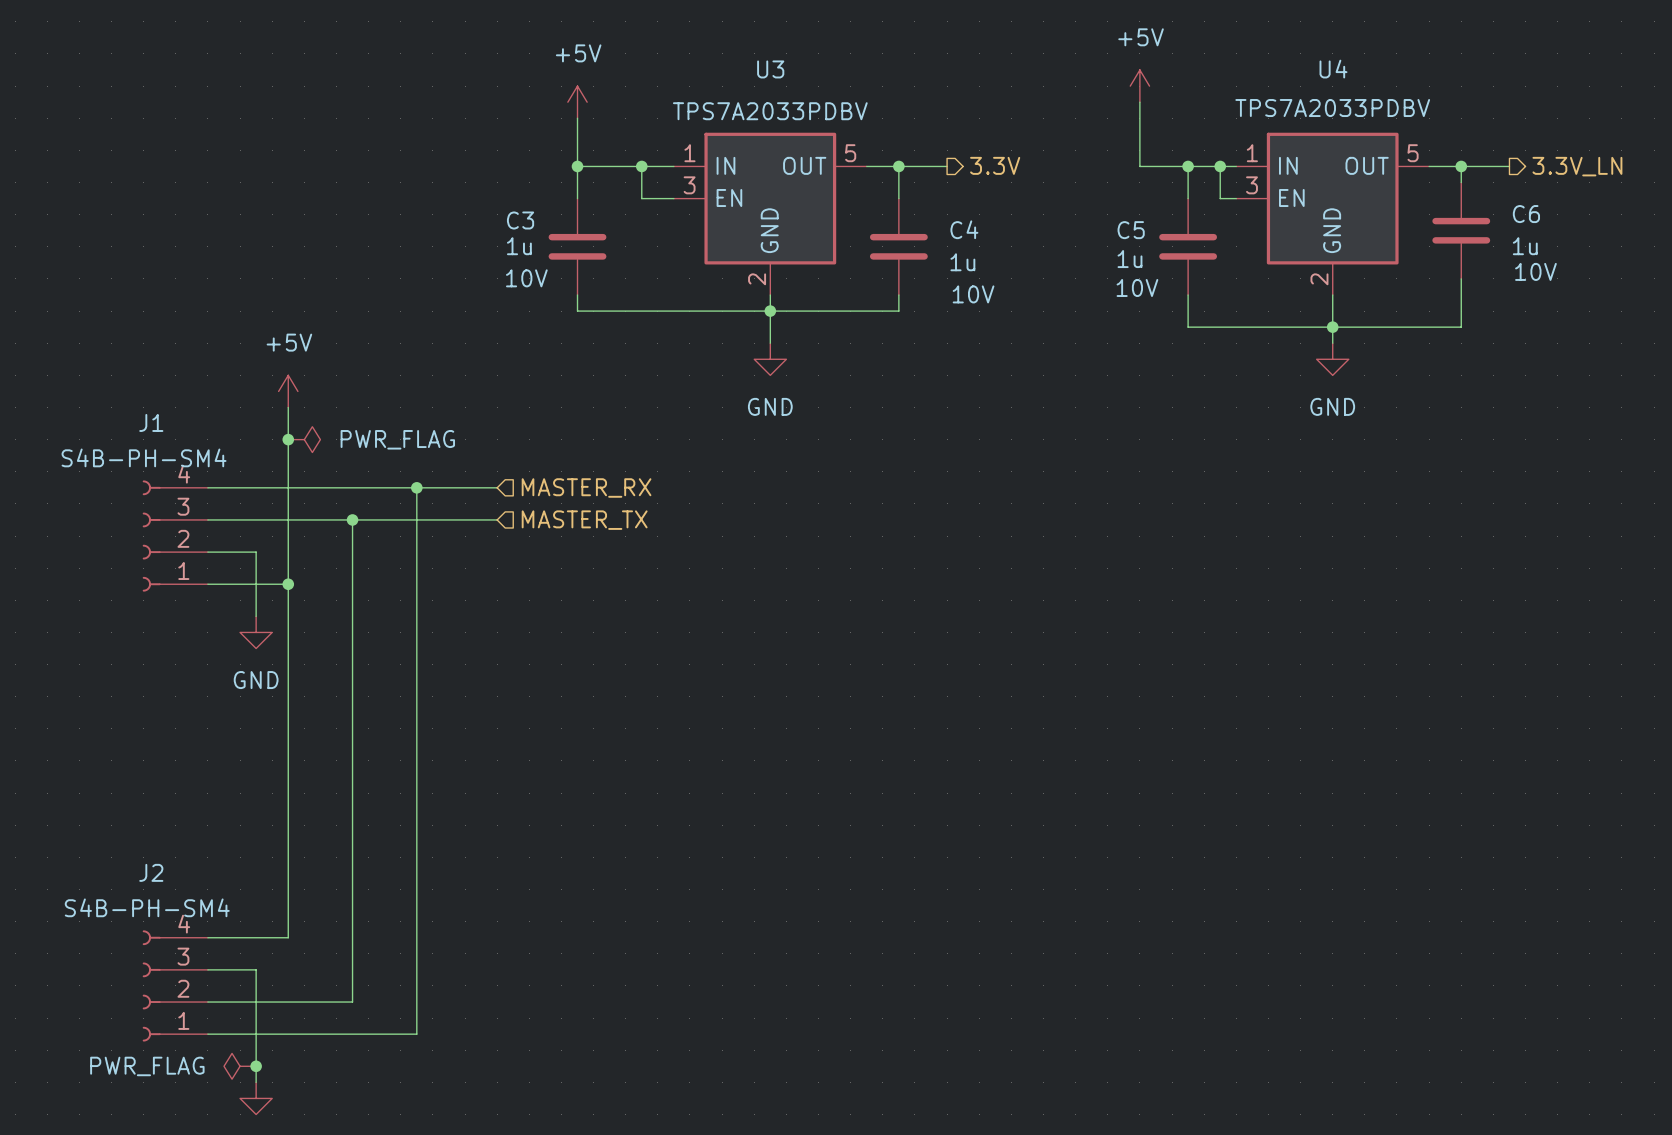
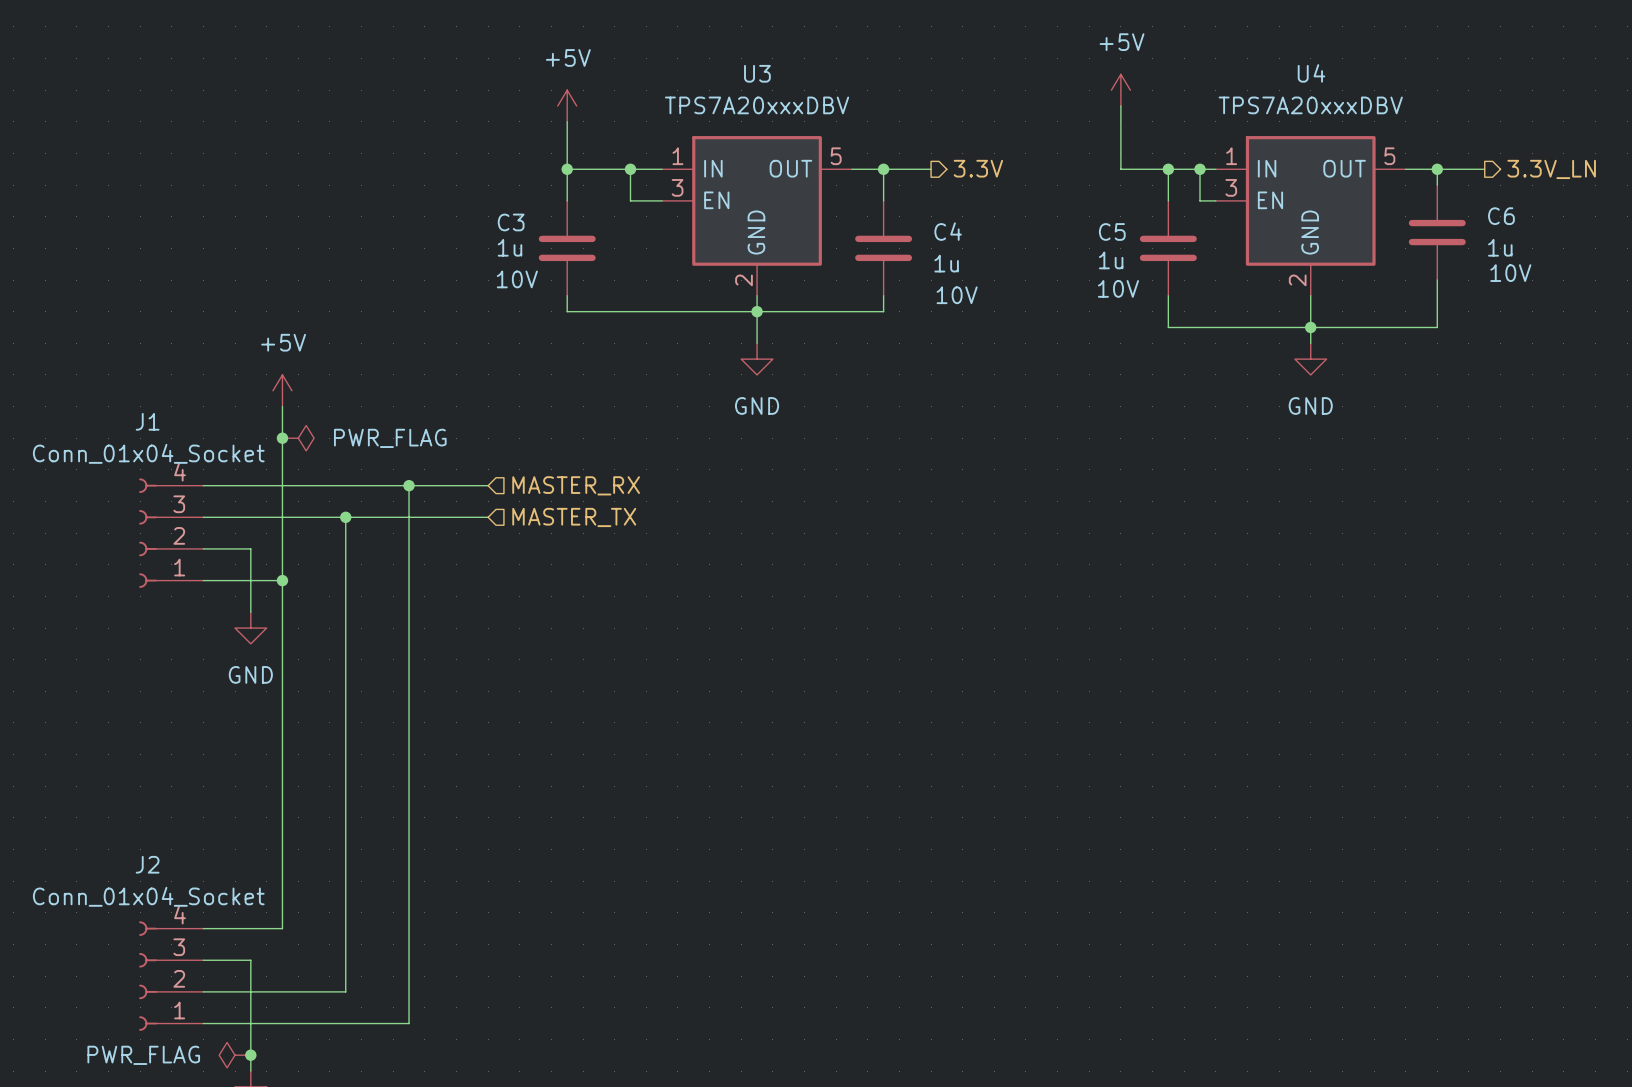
U3 value: none -> TPS7A20xxxDBV (757, 105)
U4 value: none -> TPS7A20xxxDBV (1310, 105)
U4 text: TPS7A2033PDBV (1332, 108) -> none
U3 text: TPS7A2033PDBV (770, 111) -> none
J1 value: none -> Conn_01x04_Socket (148, 453)
J1 text: S4B-PH-SM4 (144, 457) -> none
J2 value: none -> Conn_01x04_Socket (148, 896)
J2 text: S4B-PH-SM4 (147, 907) -> none

